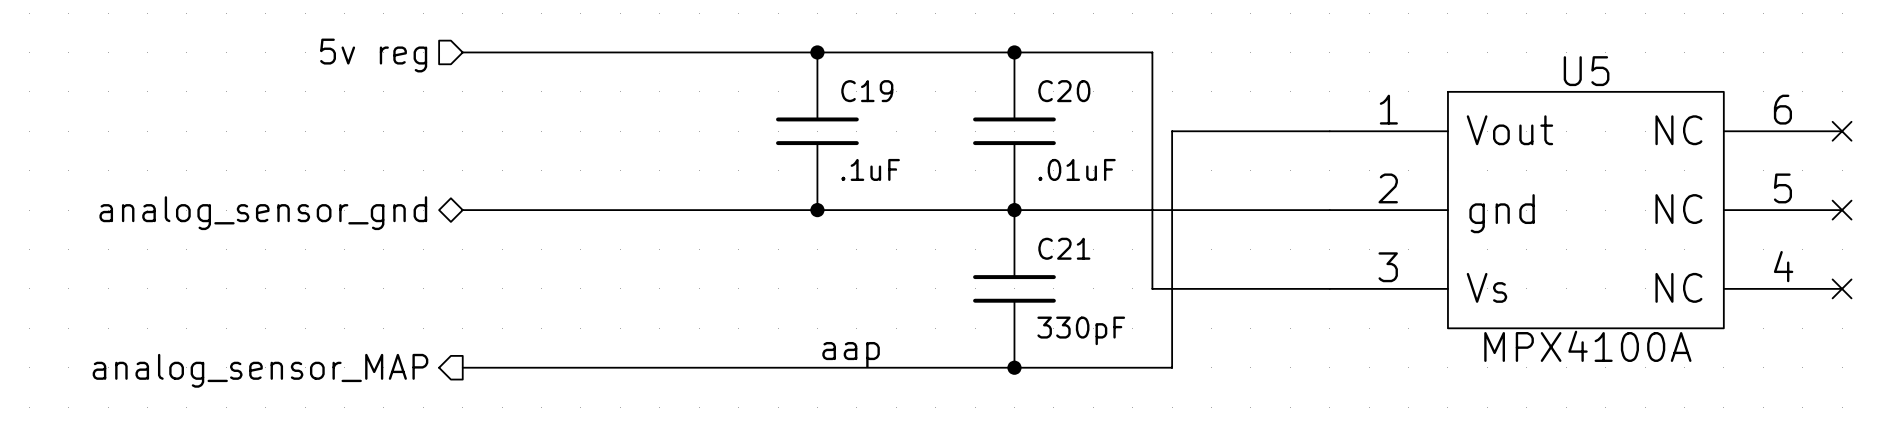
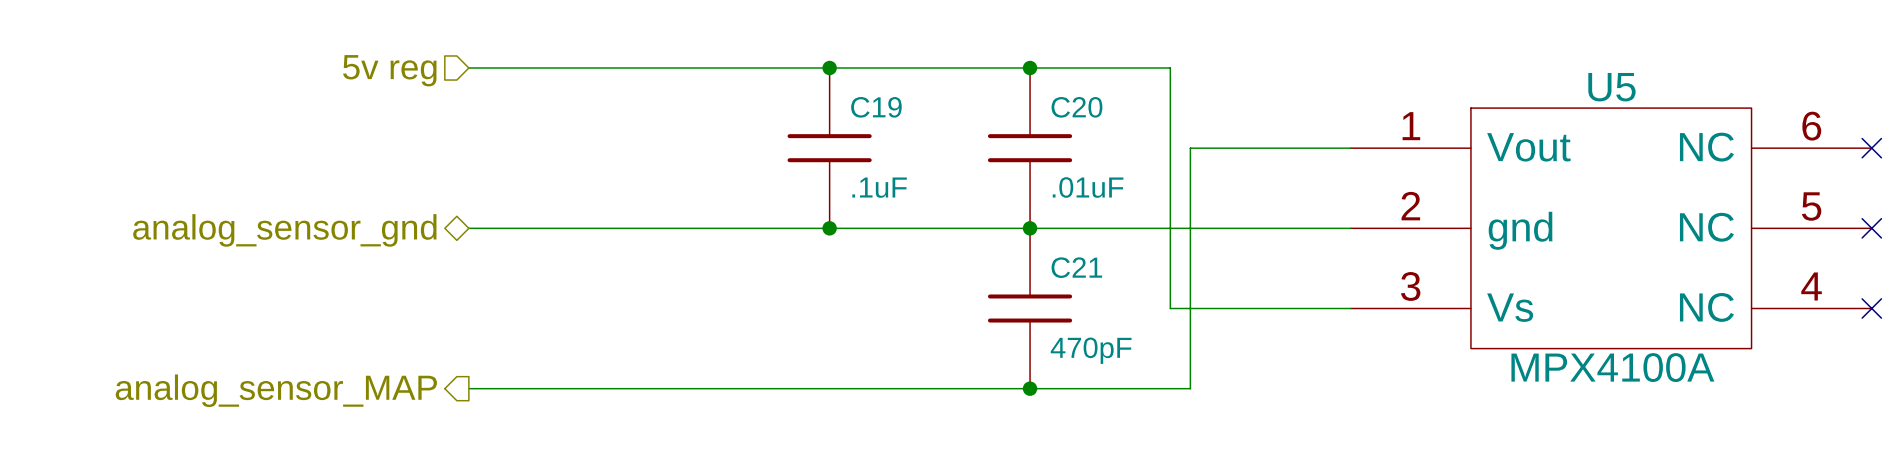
C21 value: 330pF (1081, 330) -> 470pF (1091, 350)
label: aap (851, 354) -> none

